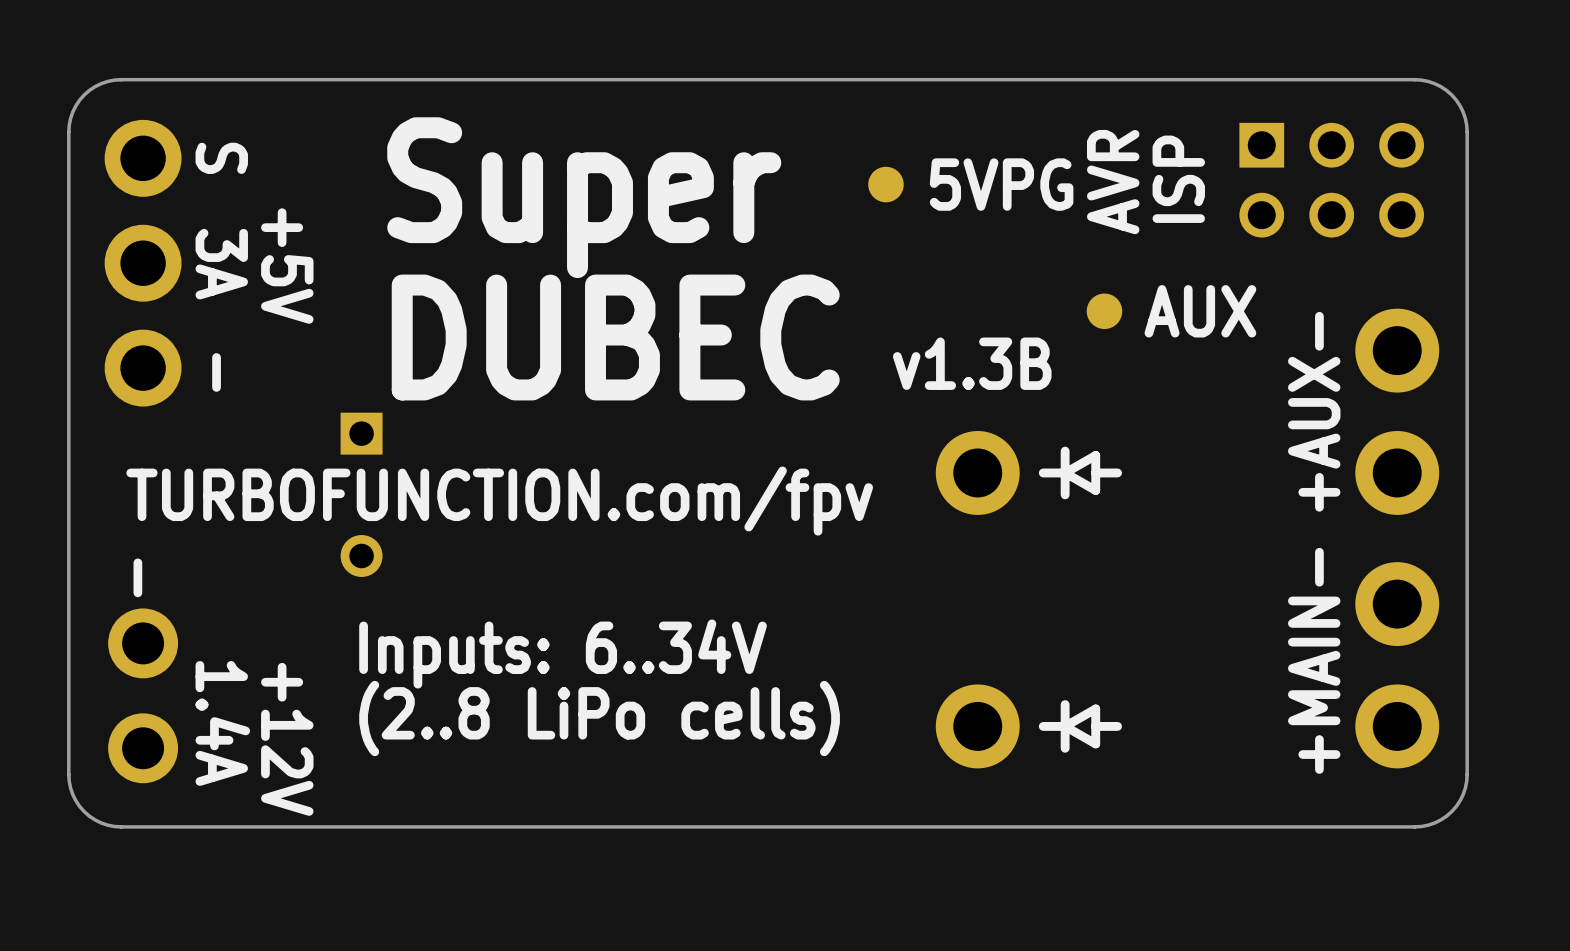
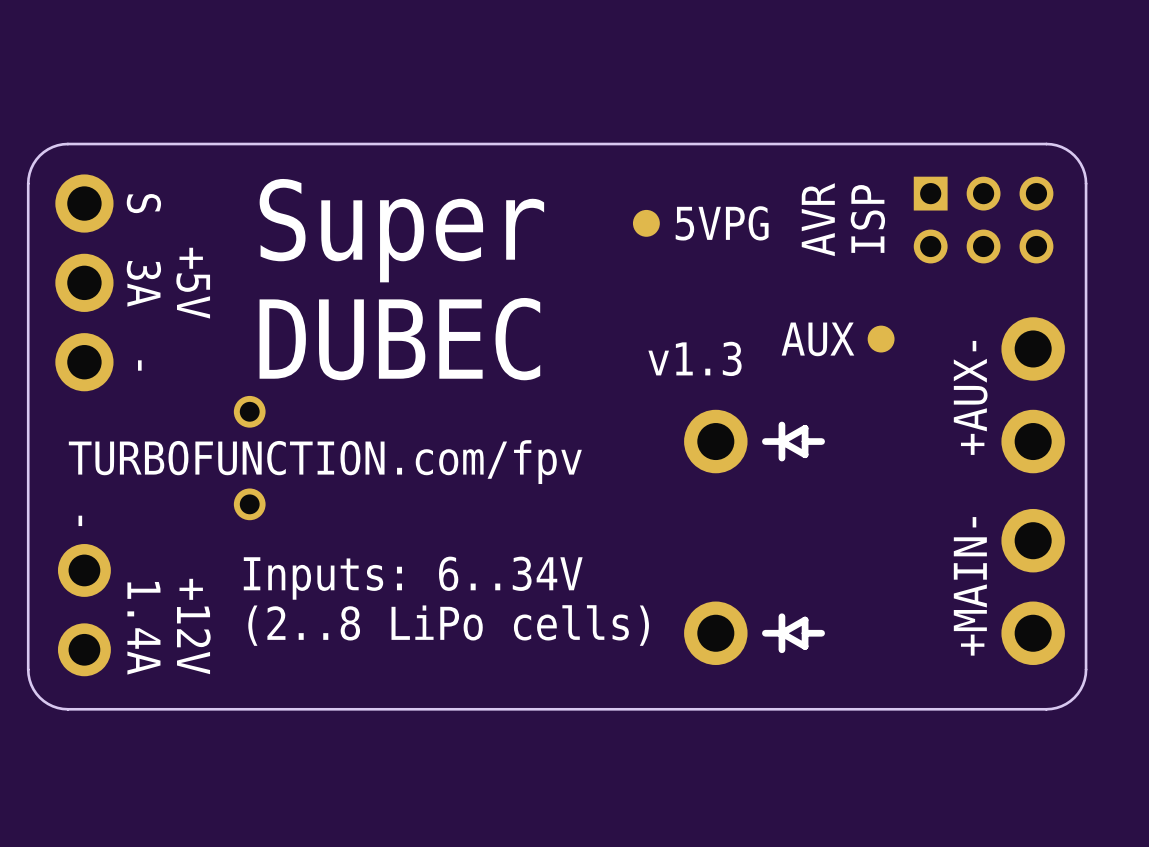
part position: (1104, 311) -> (881, 339)
text position: AUX (1200, 311) -> AUX (817, 339)
text: v1.3B (972, 363) -> v1.3 (695, 358)
part: none -> (249, 411)
part: (361, 494) -> none
part: none -> (249, 504)

